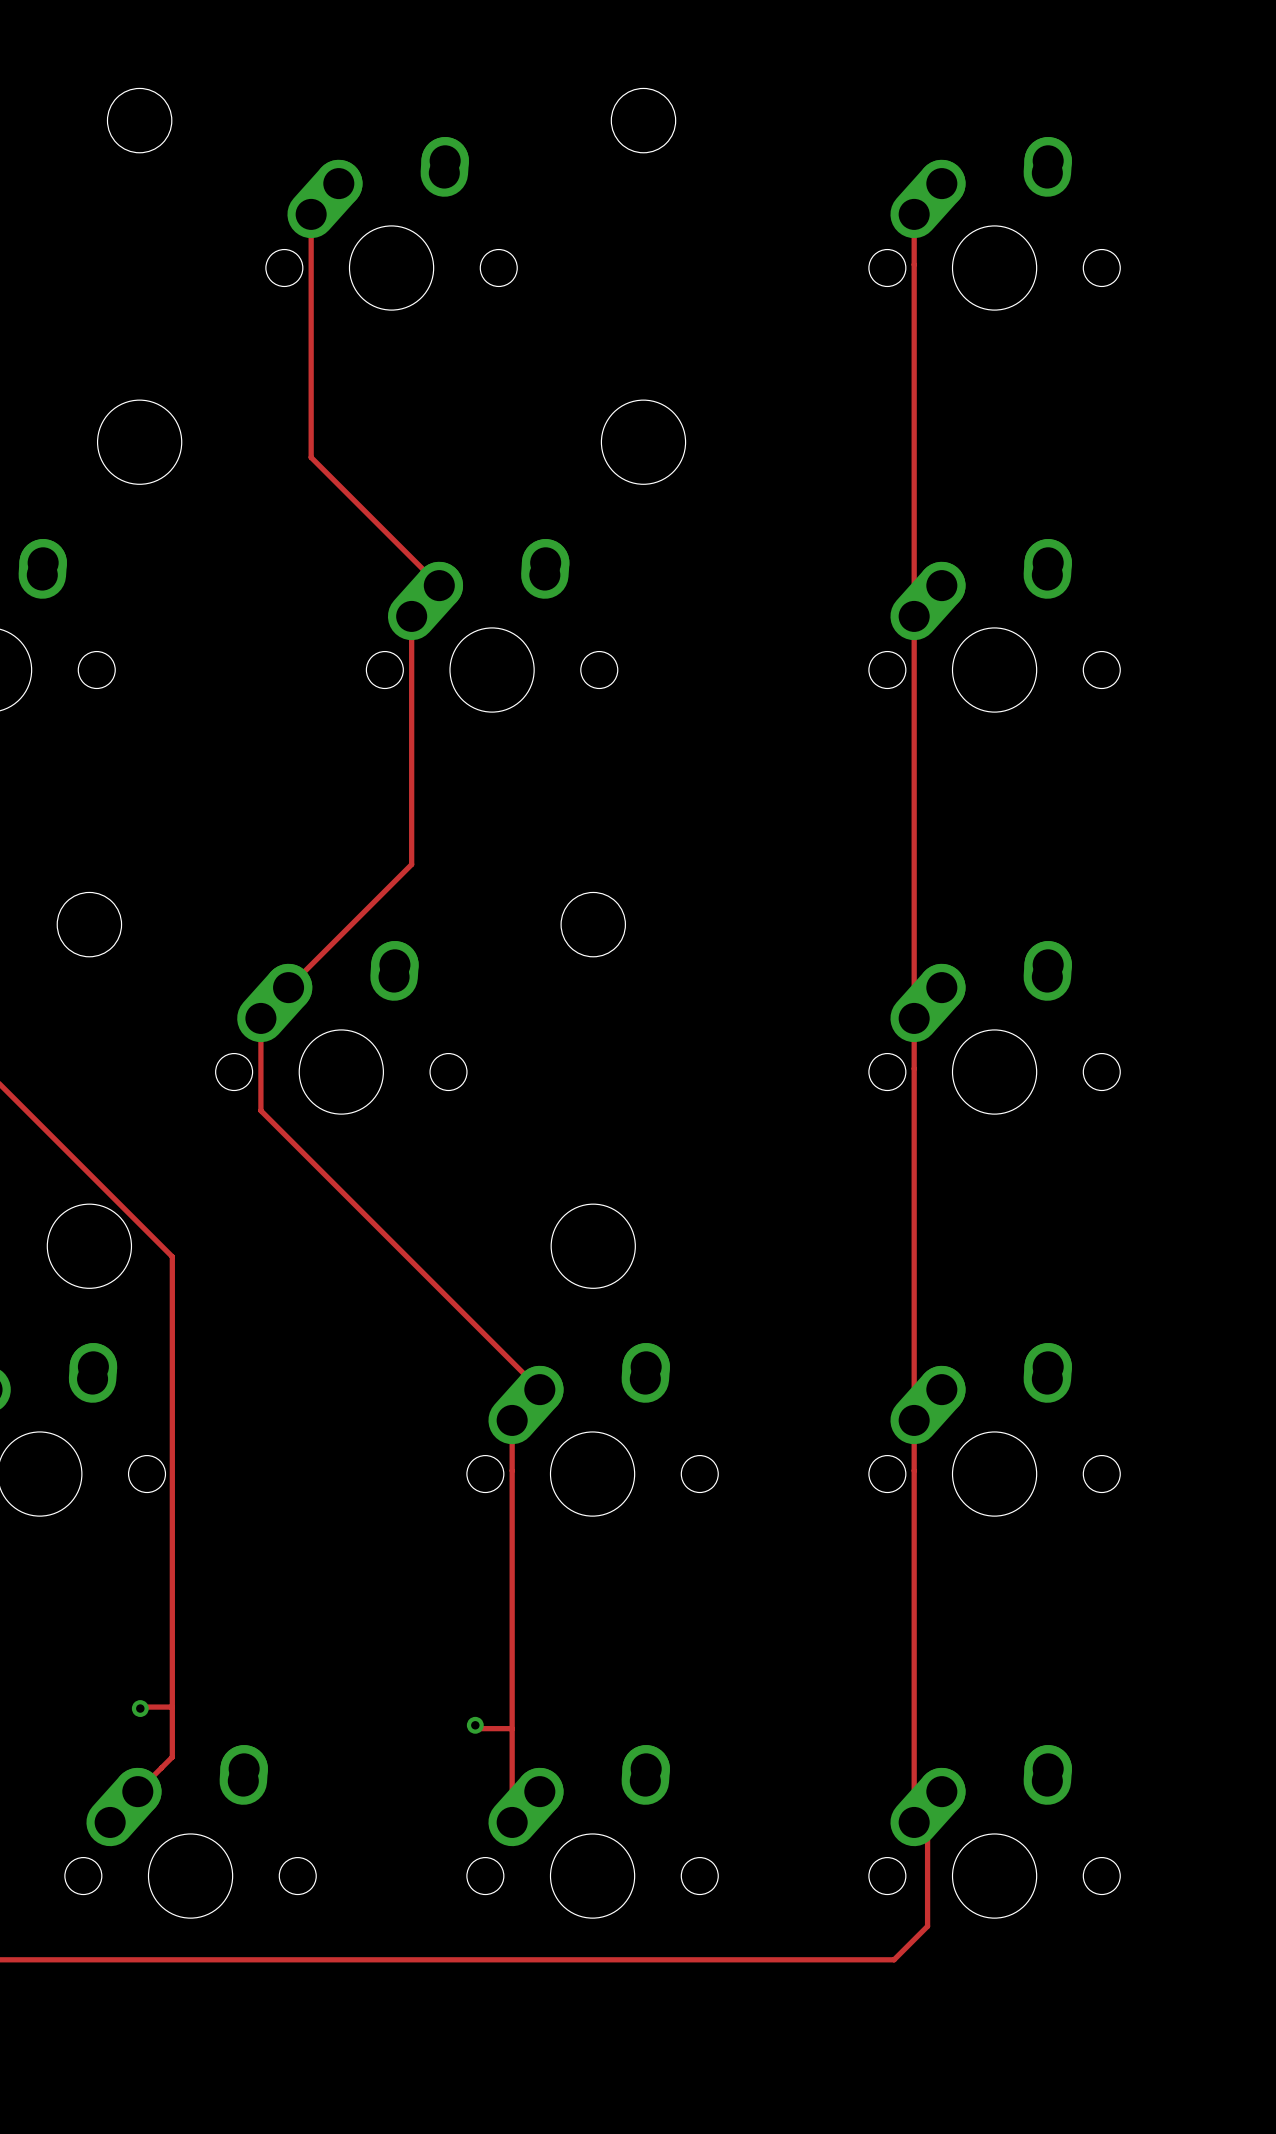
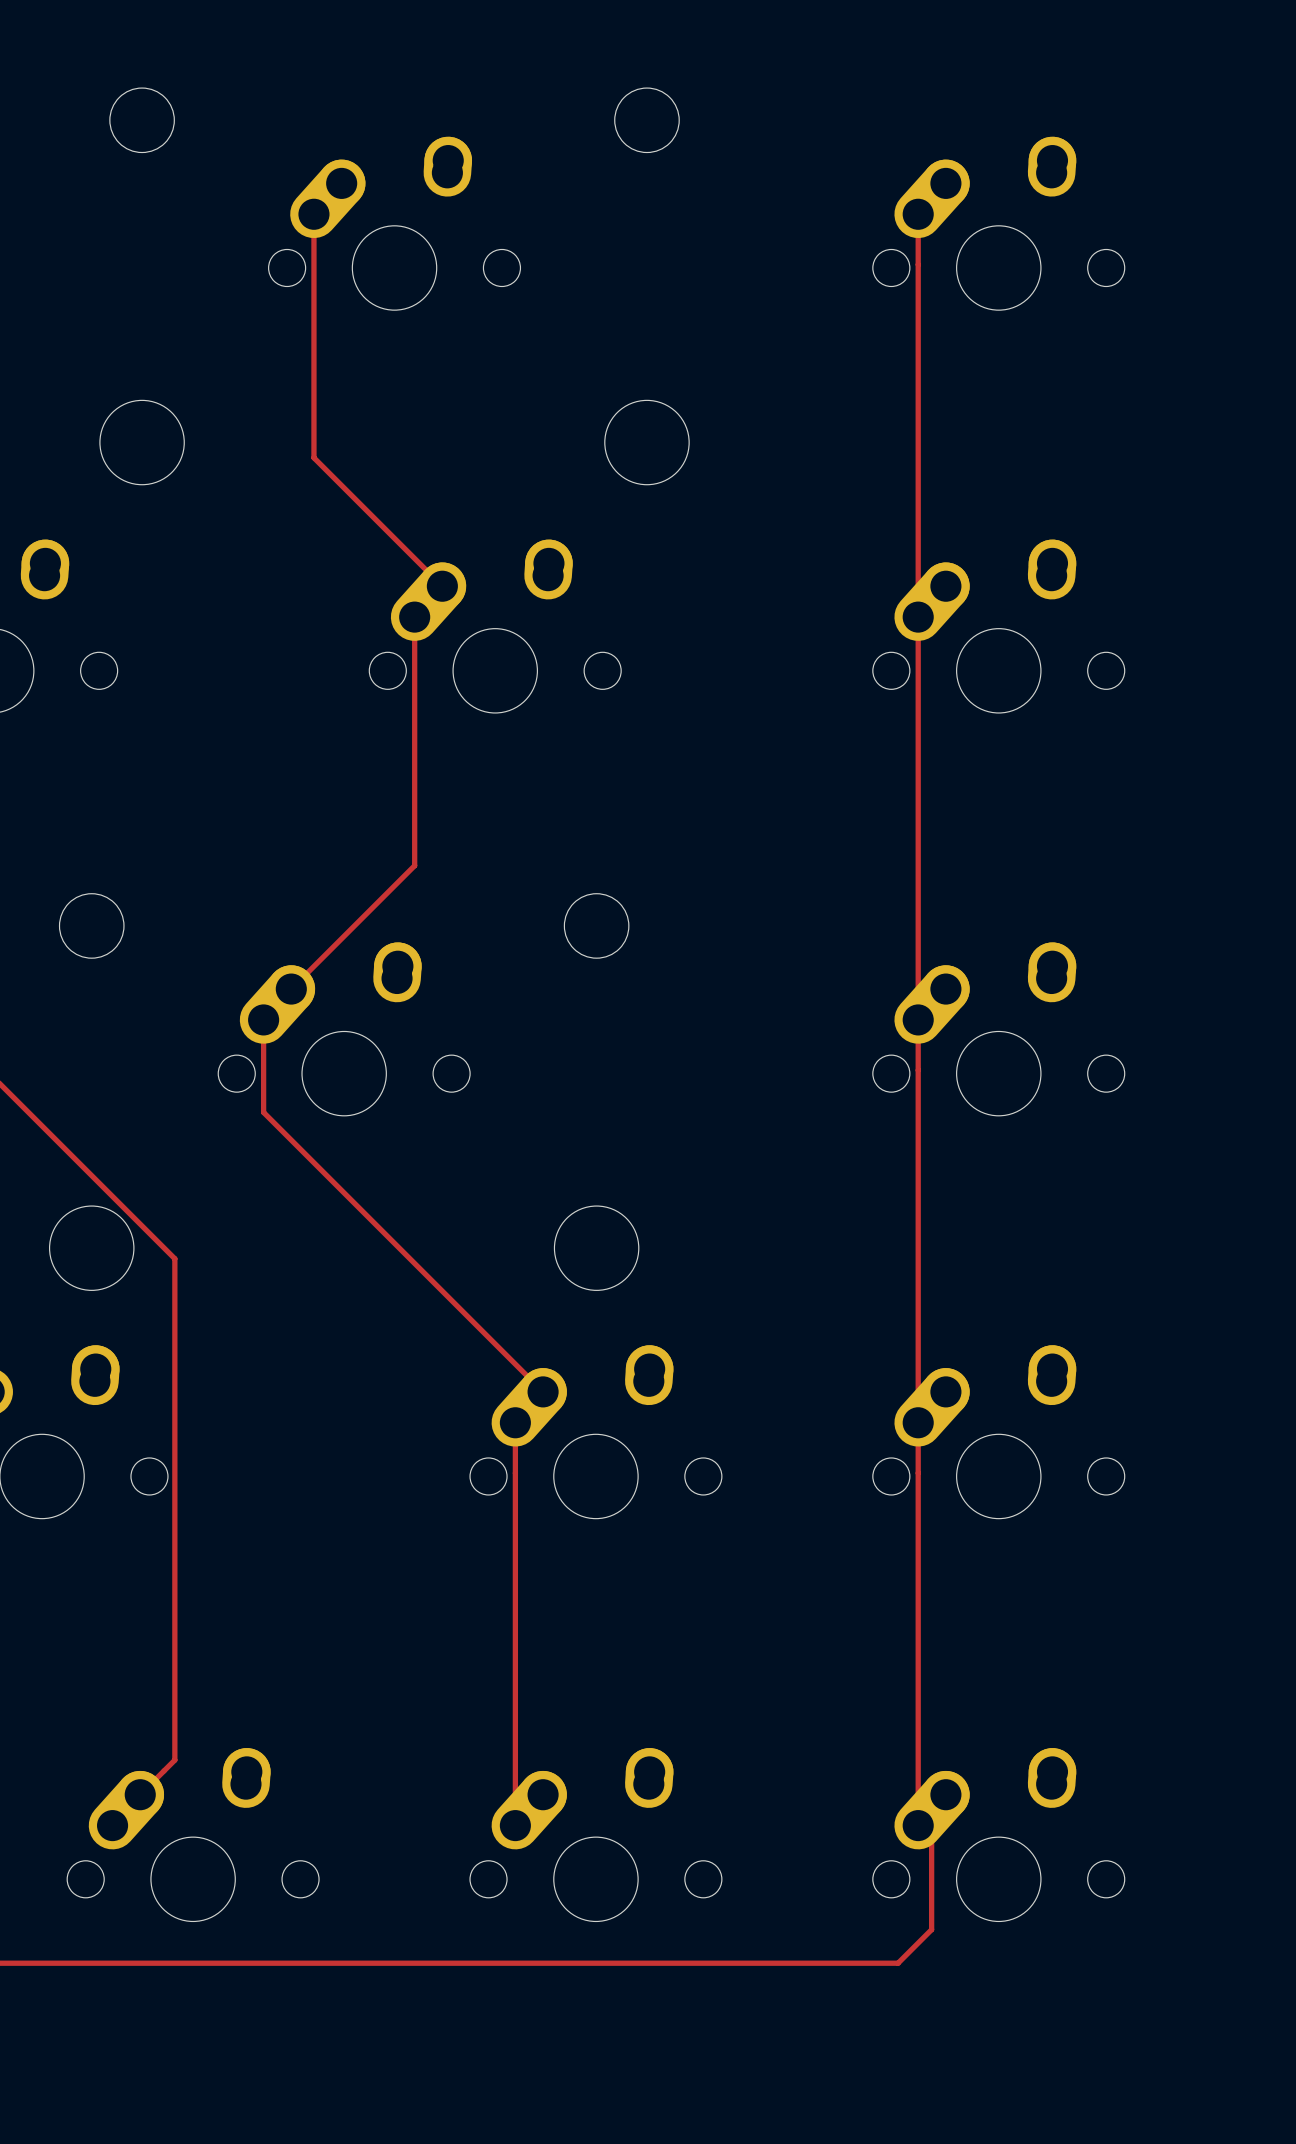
track: (172, 1707) (140, 1708) -> none
via: (140, 1708) -> none
track: (475, 1725) (478, 1728) (512, 1728) -> none
via: (475, 1725) -> none

